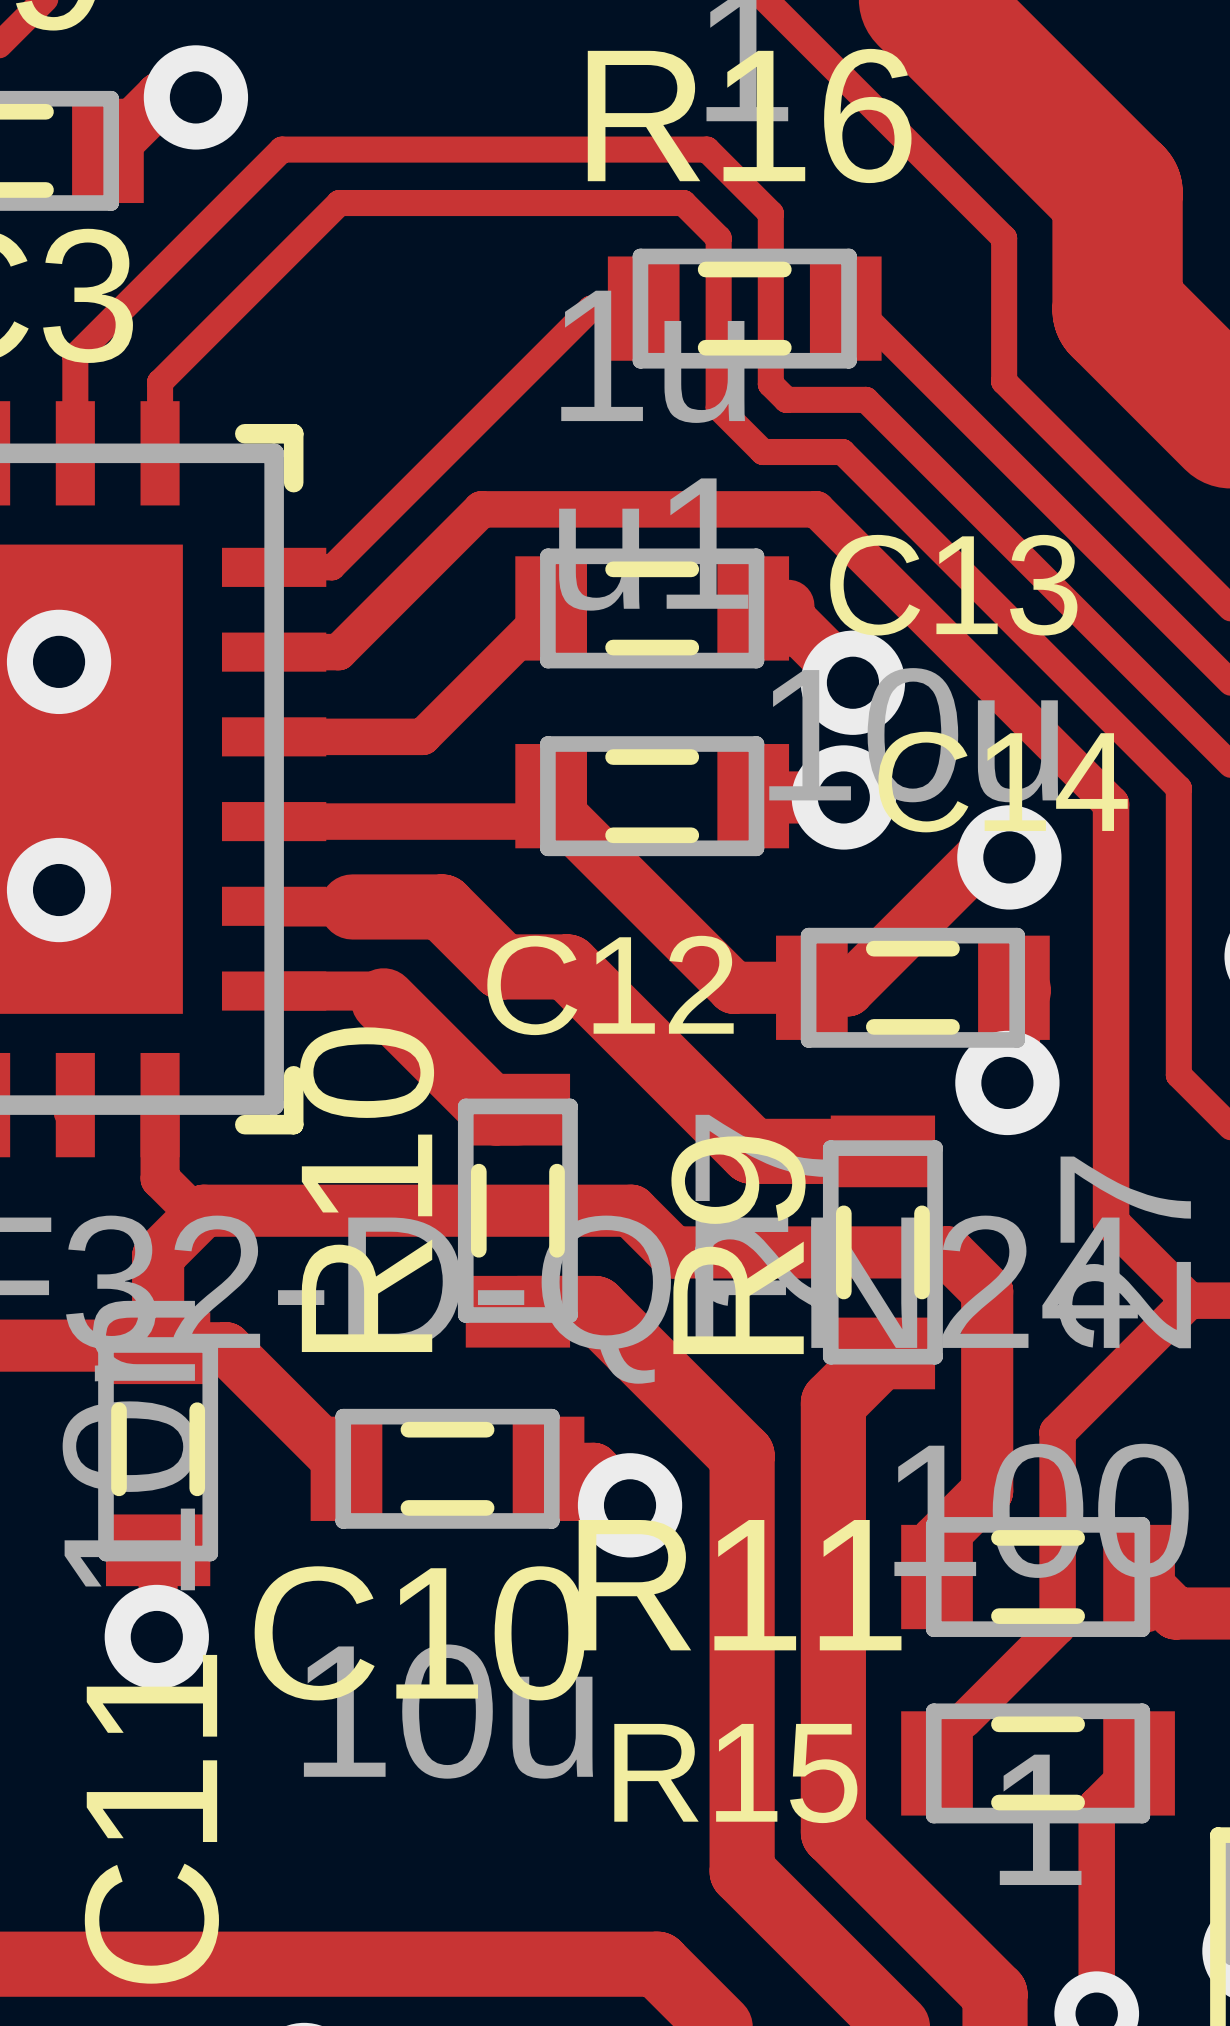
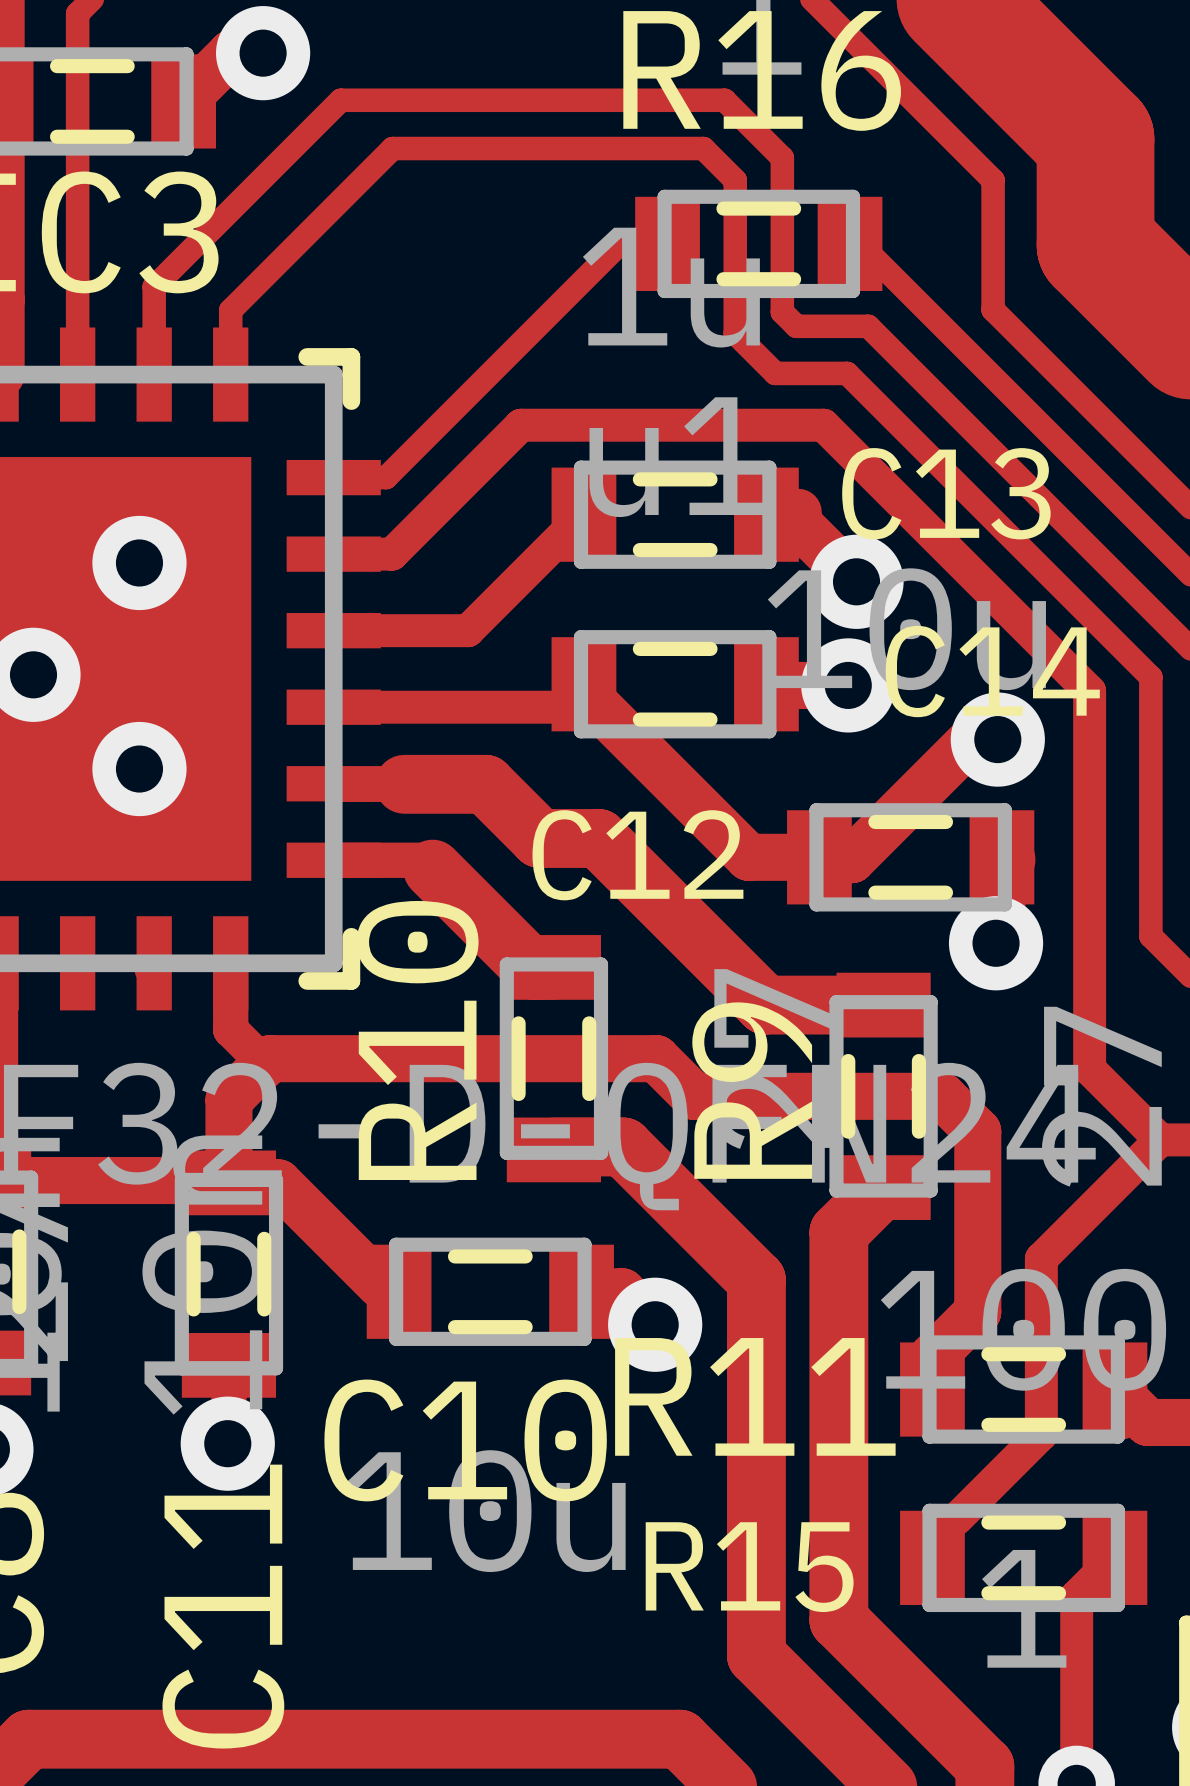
track: (212, 1348) (225, 1348) (346, 1468) -> (278, 1182) (380, 1284)

